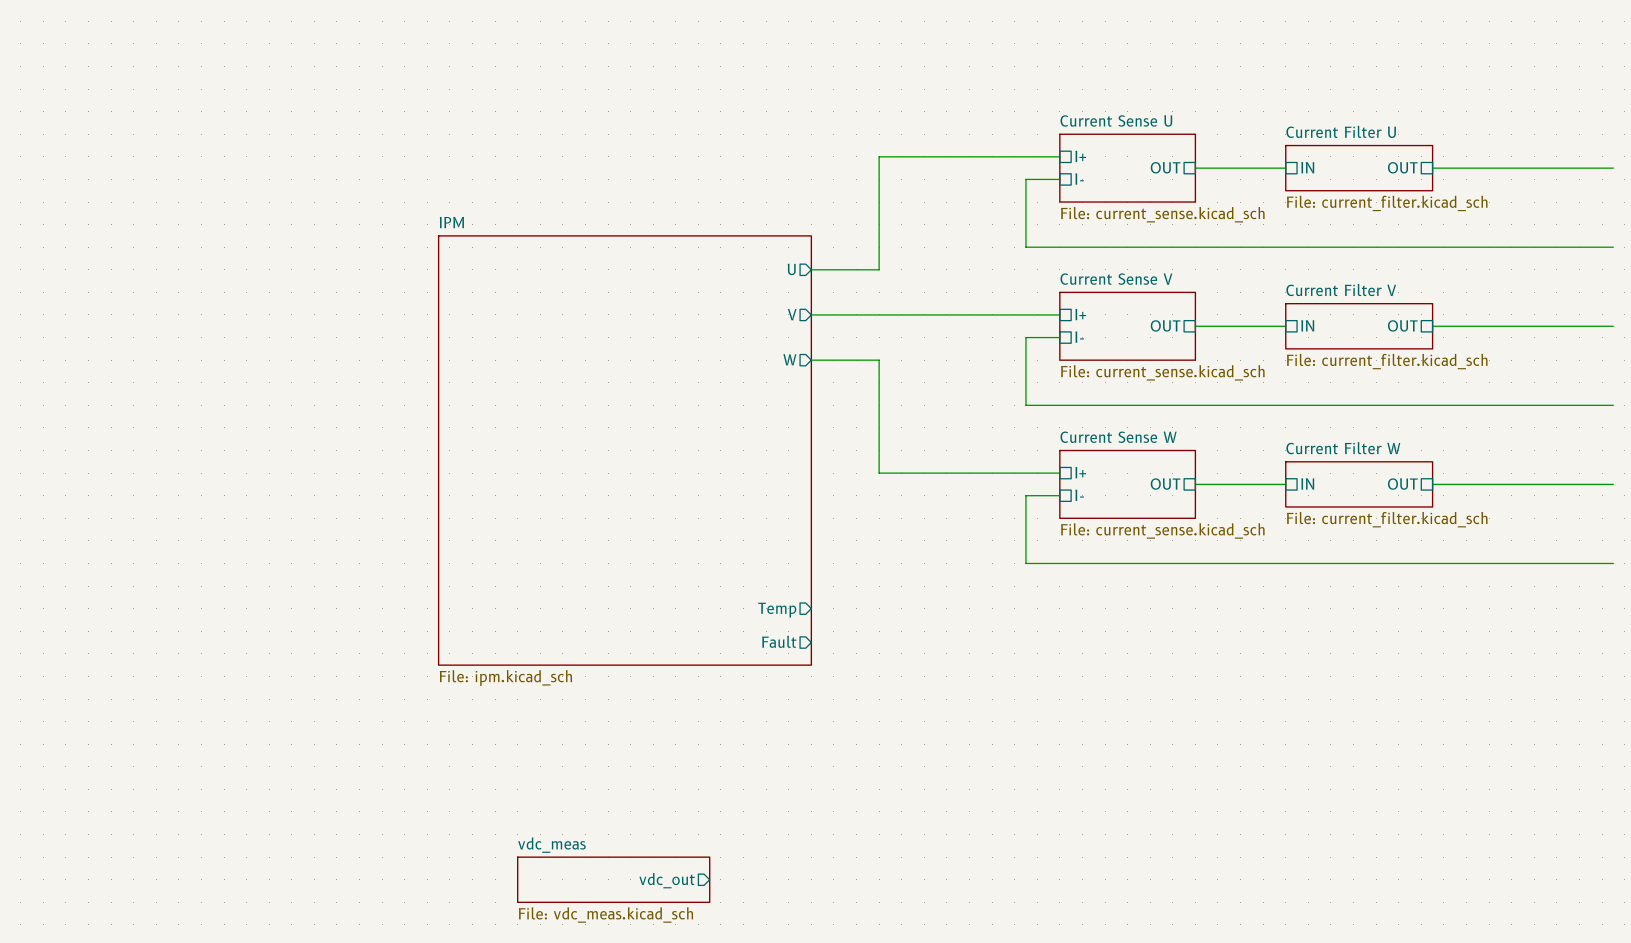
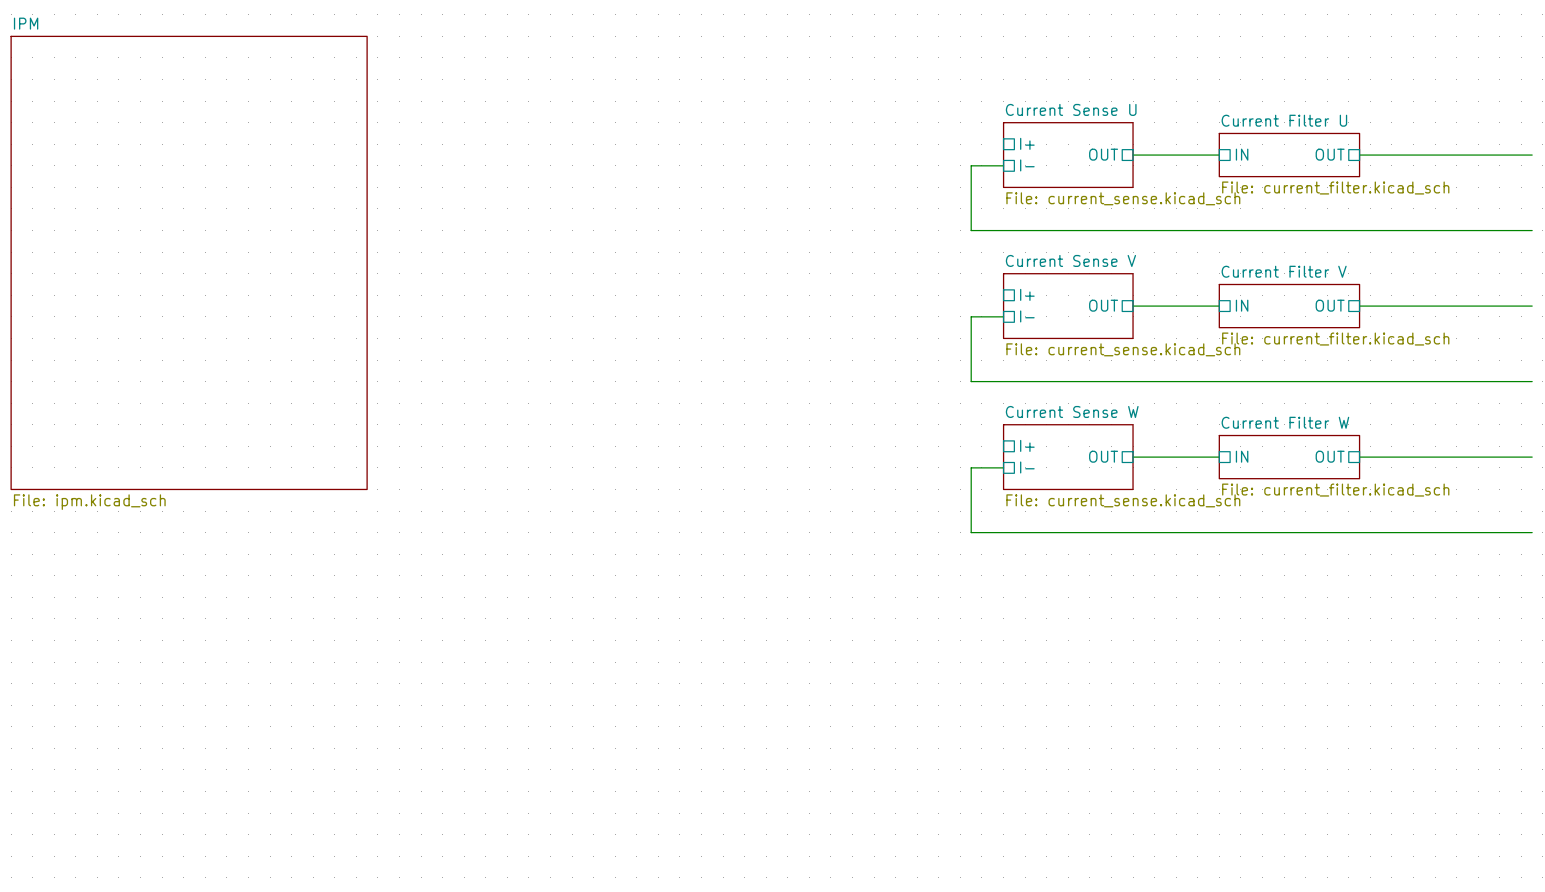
wire: (1059, 156) (879, 156) (879, 269) (811, 269) -> none
sheet pin: U (791, 269) -> none
sheet IPM: none -> File: ipm.kicad_sch (189, 262)
sheet pin: V (792, 314) -> none
wire: (811, 314) (1059, 314) -> none
sheet pin: W (789, 359) -> none
wire: (811, 360) (879, 360) (879, 473) (1059, 473) -> none
sheet IPM: File: ipm.kicad_sch (624, 450) -> none
sheet pin: Temp (777, 610) -> none
sheet pin: Fault (779, 641) -> none
sheet vdc_meas: File: vdc_meas.kicad_sch (613, 879) -> none
sheet pin: vdc_out (667, 880) -> none

